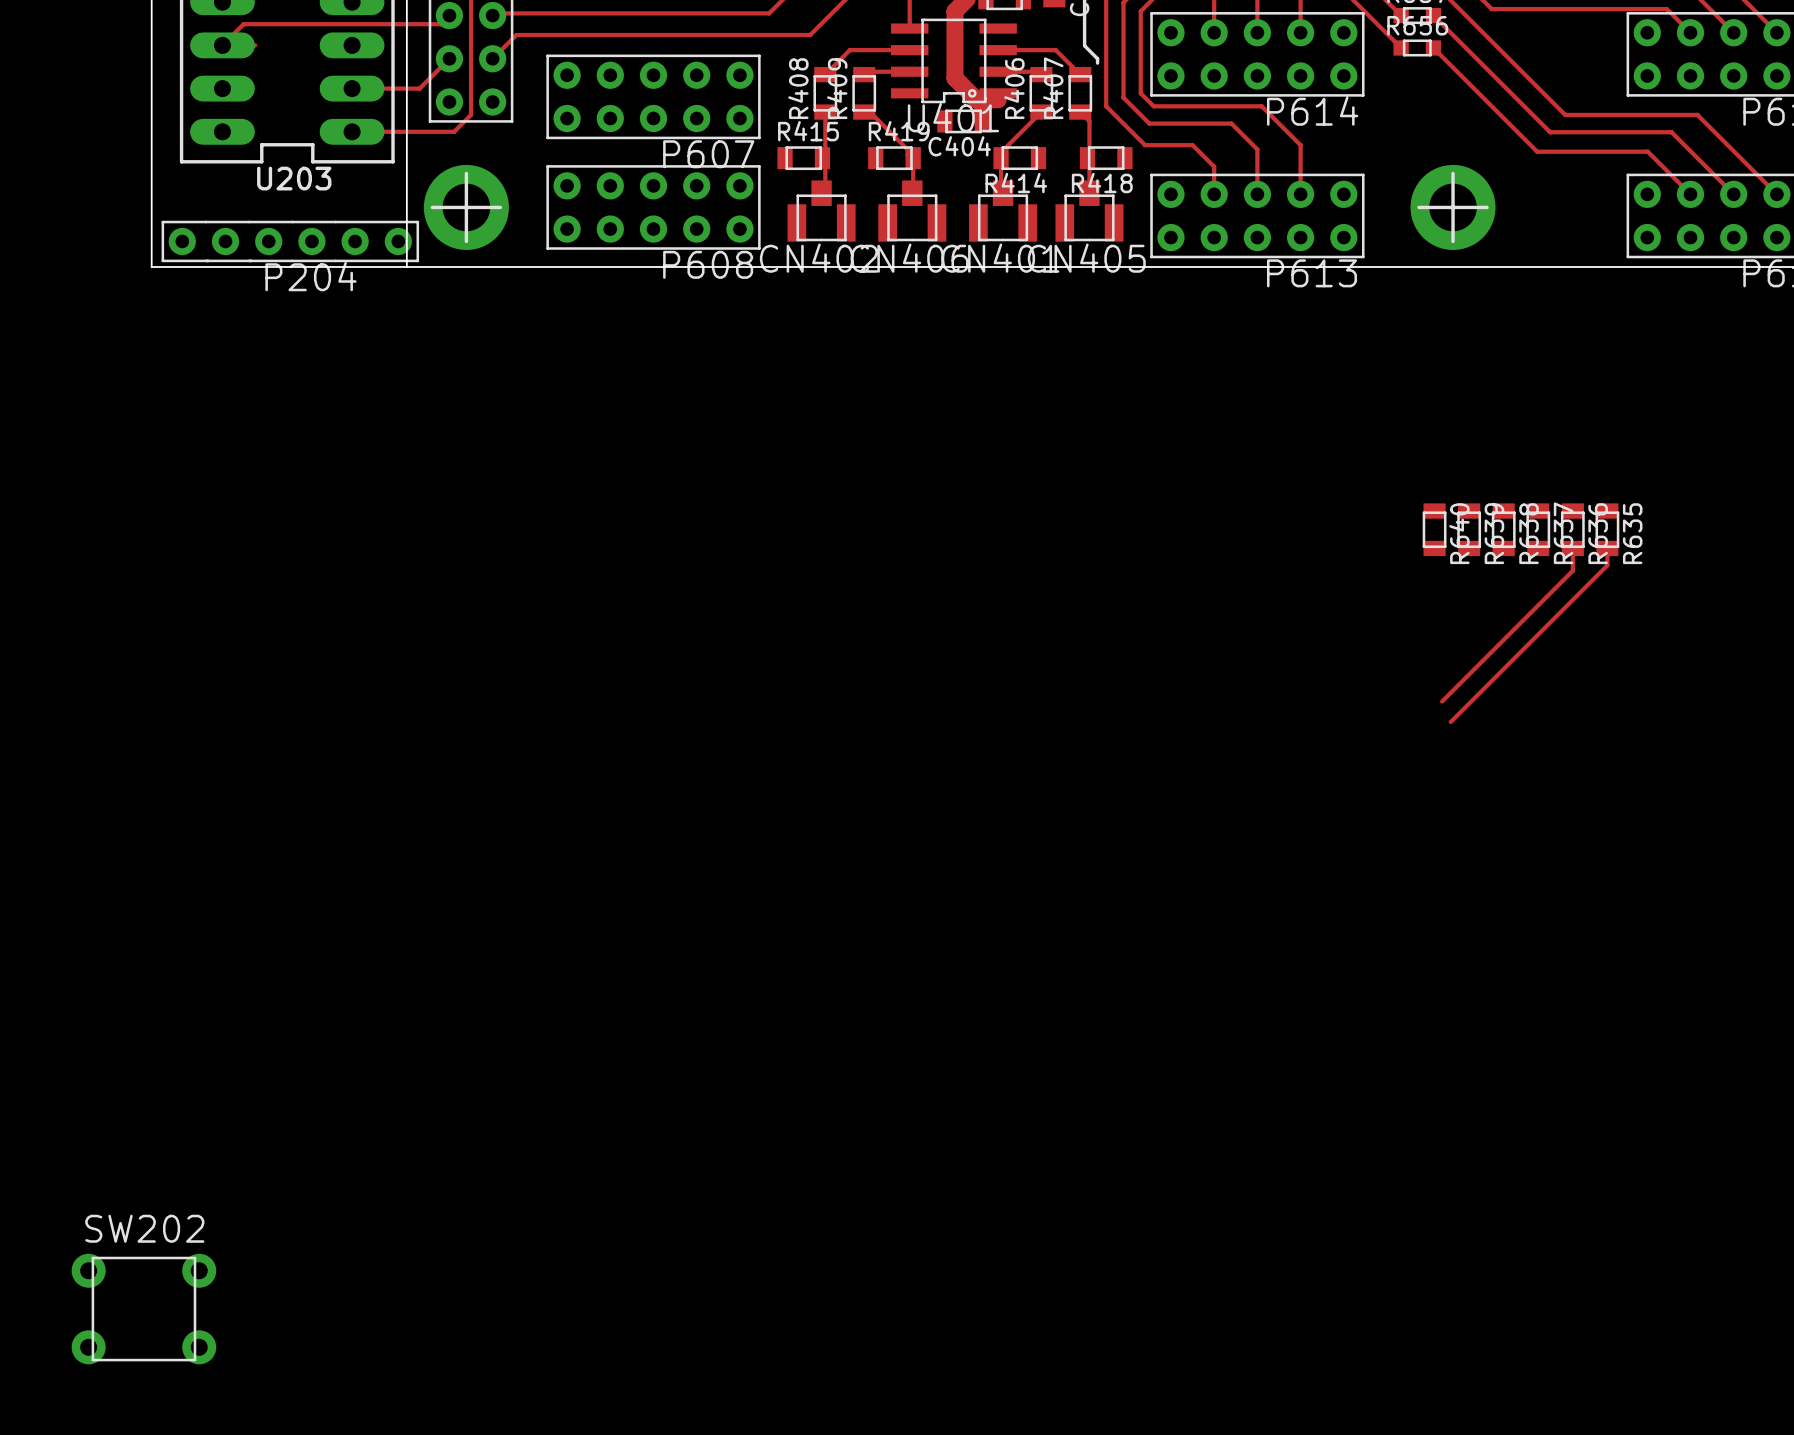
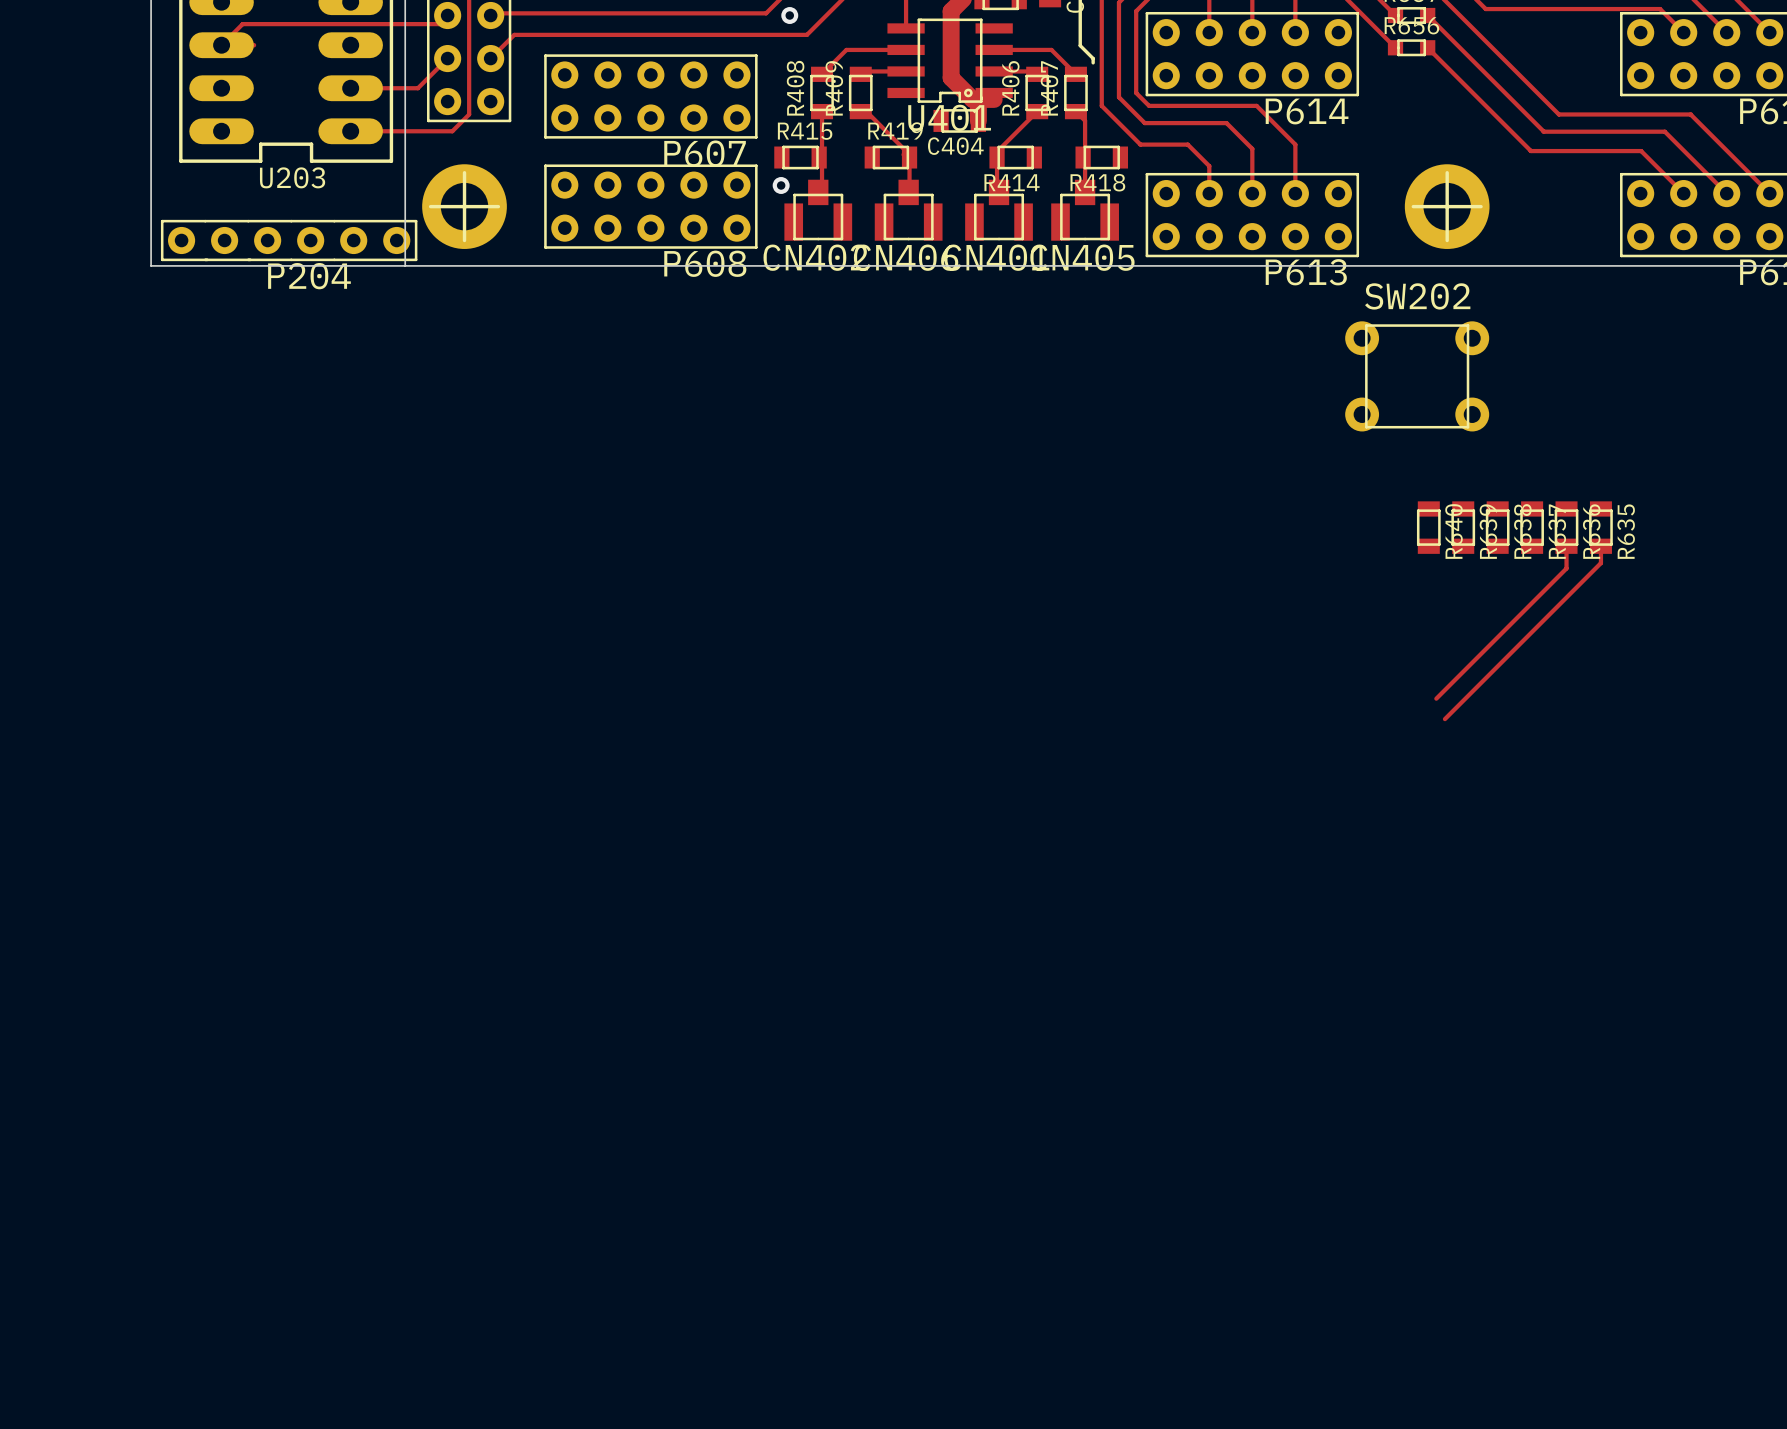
via: none -> (789, 15)
via: none -> (781, 185)
SW202 position: (143, 1309) -> (1417, 376)

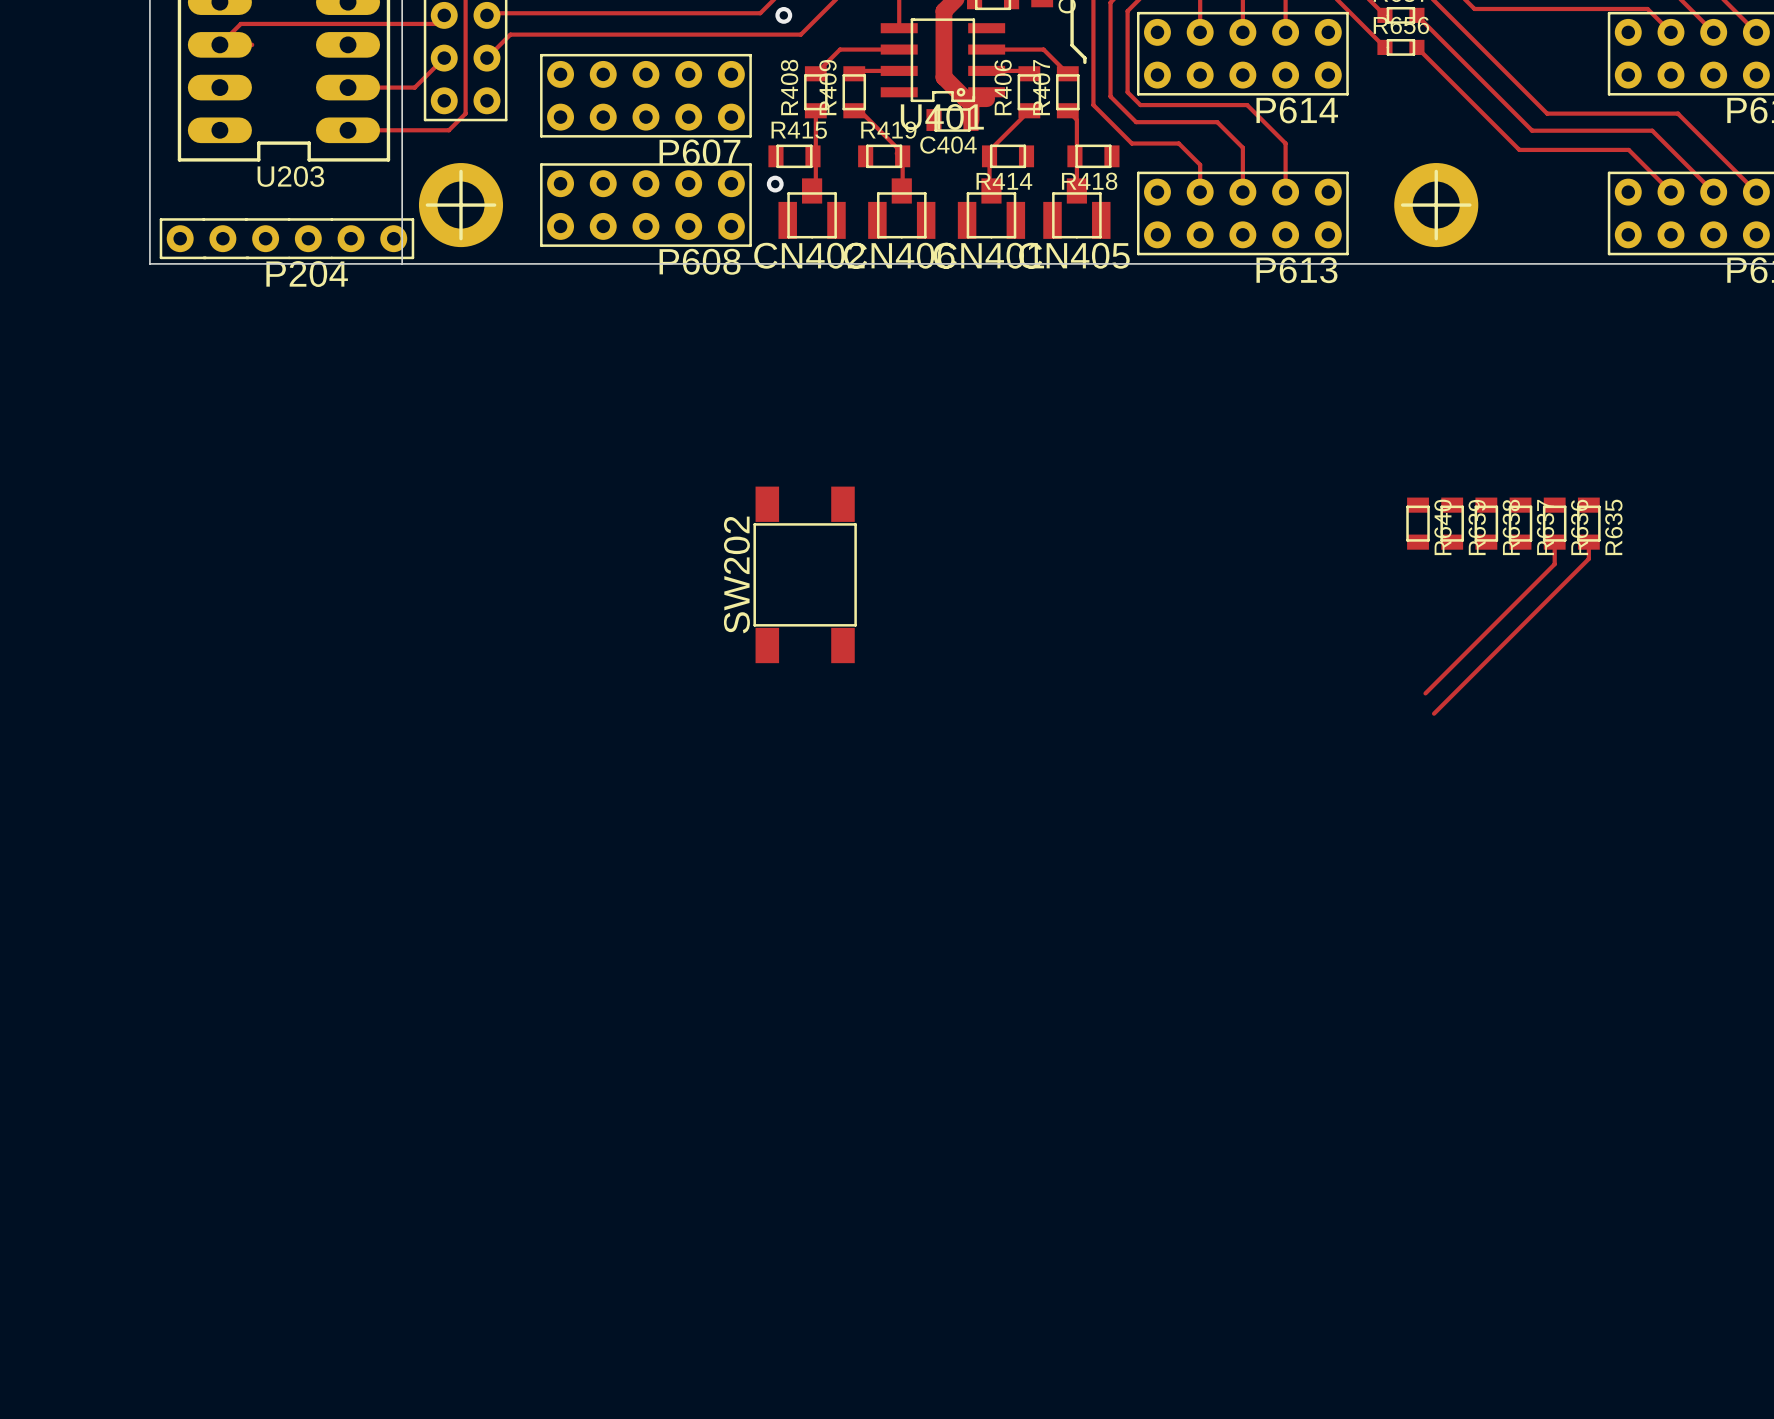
SW202 name position: SW202 (1417, 296) -> SW202 (736, 574)
SW202 footprint: [1345, 321, 1490, 432] -> [753, 486, 857, 664]

